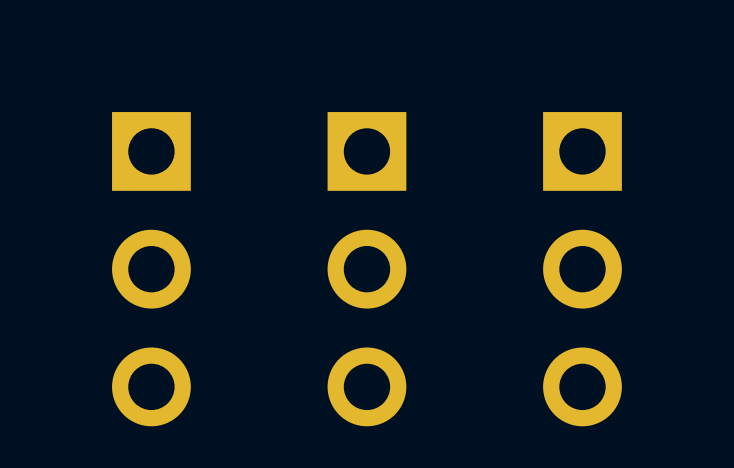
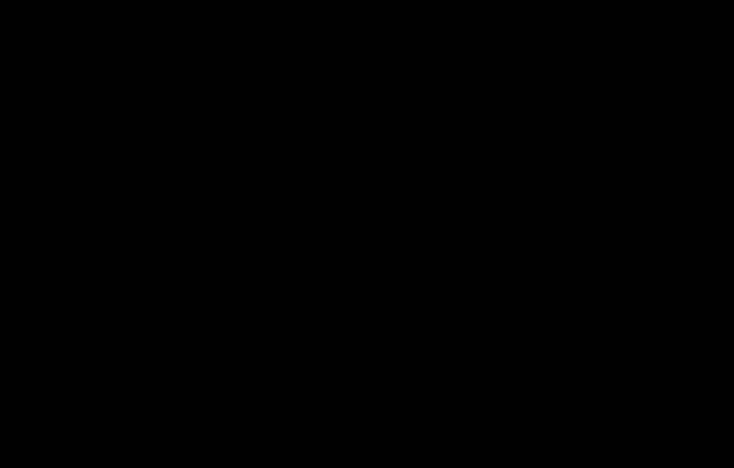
part: (151, 269) -> none
part: (366, 269) -> none
part: (582, 269) -> none

